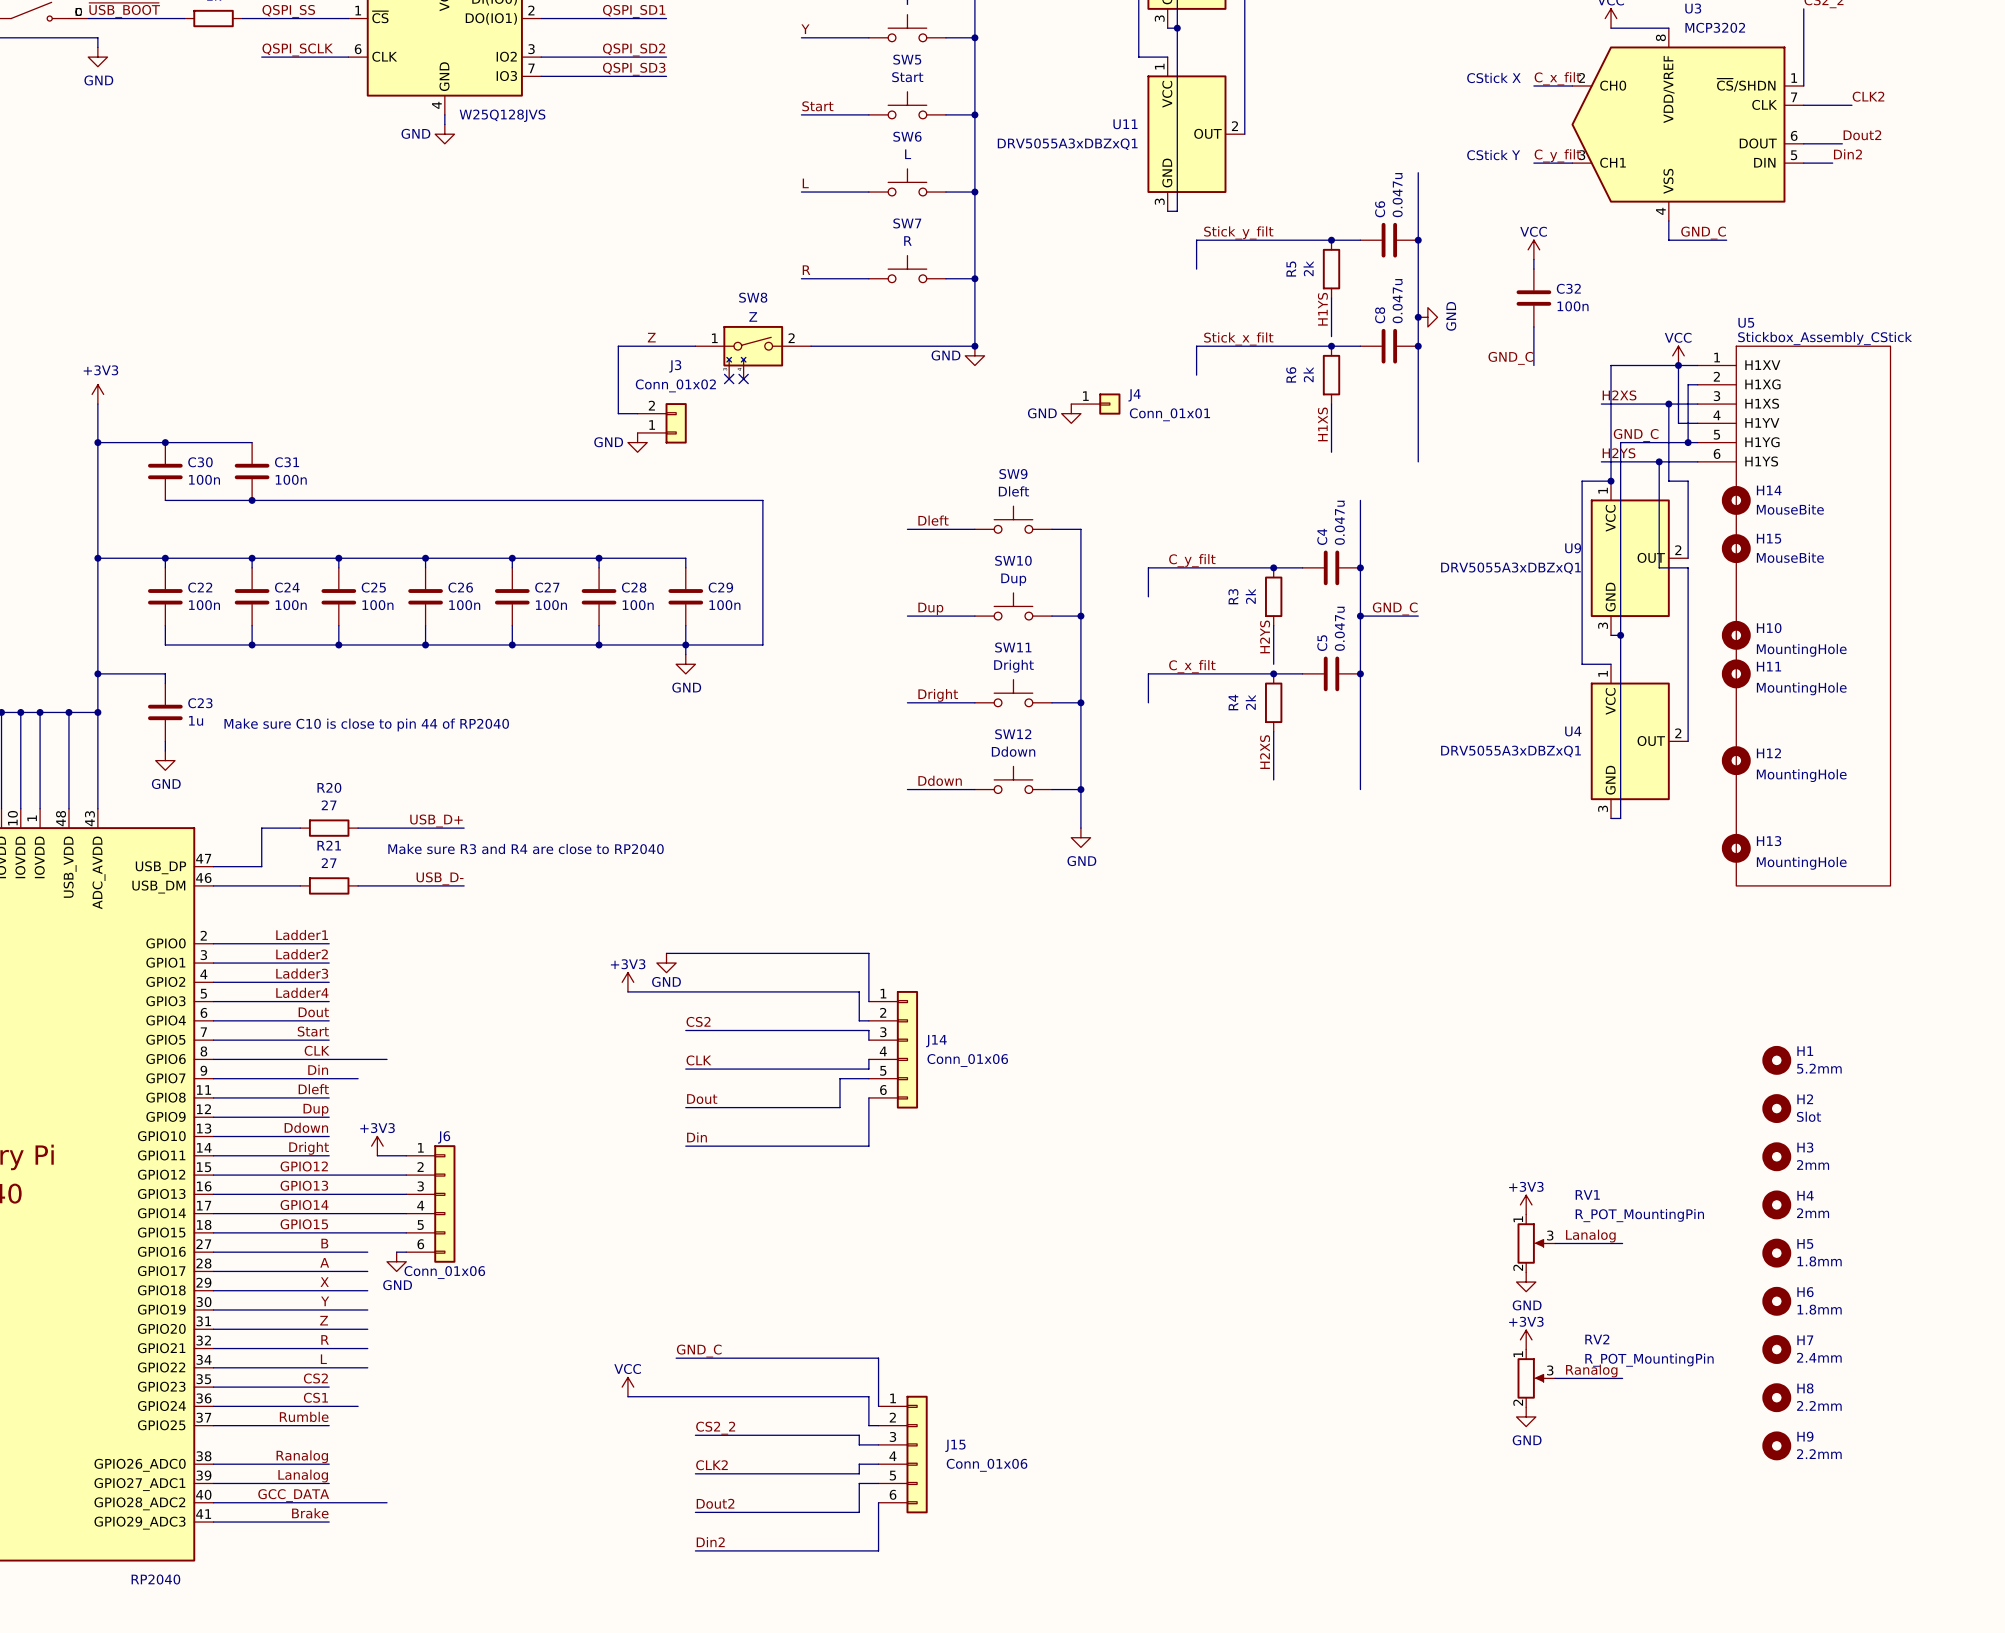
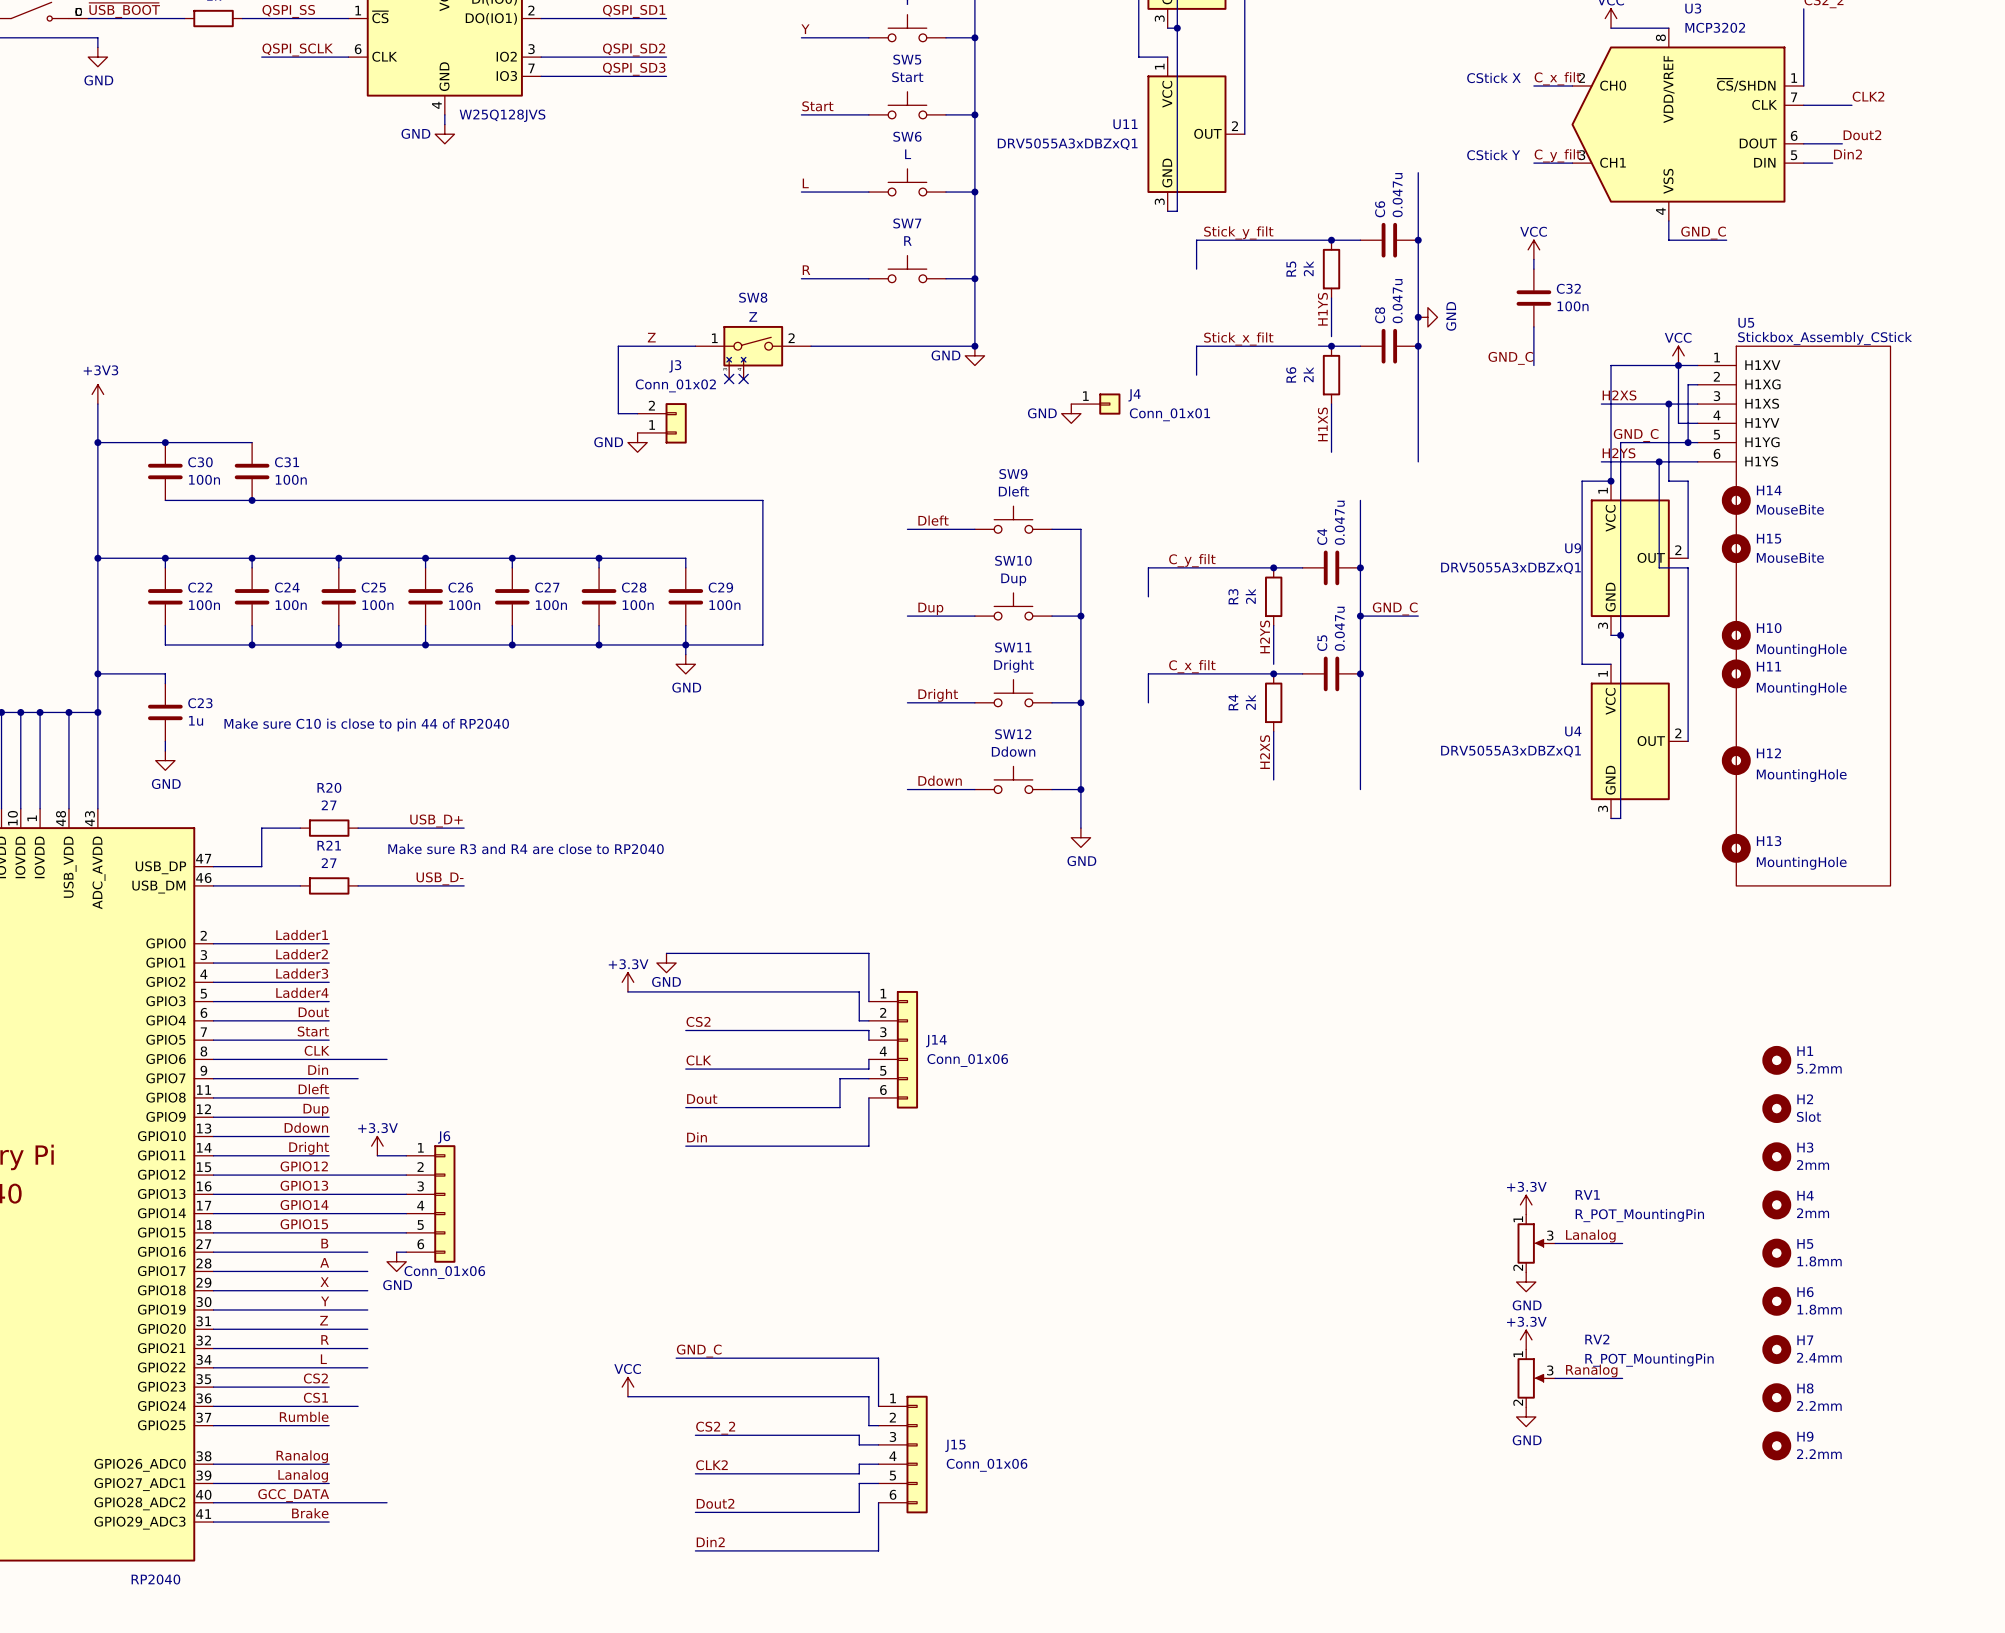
power symbol: +3V3 (627, 982) -> +3.3V (627, 982)
power symbol: +3V3 (377, 1146) -> +3.3V (377, 1146)
power symbol: +3V3 (1526, 1204) -> +3.3V (1526, 1204)
power symbol: +3V3 (1526, 1339) -> +3.3V (1526, 1339)

